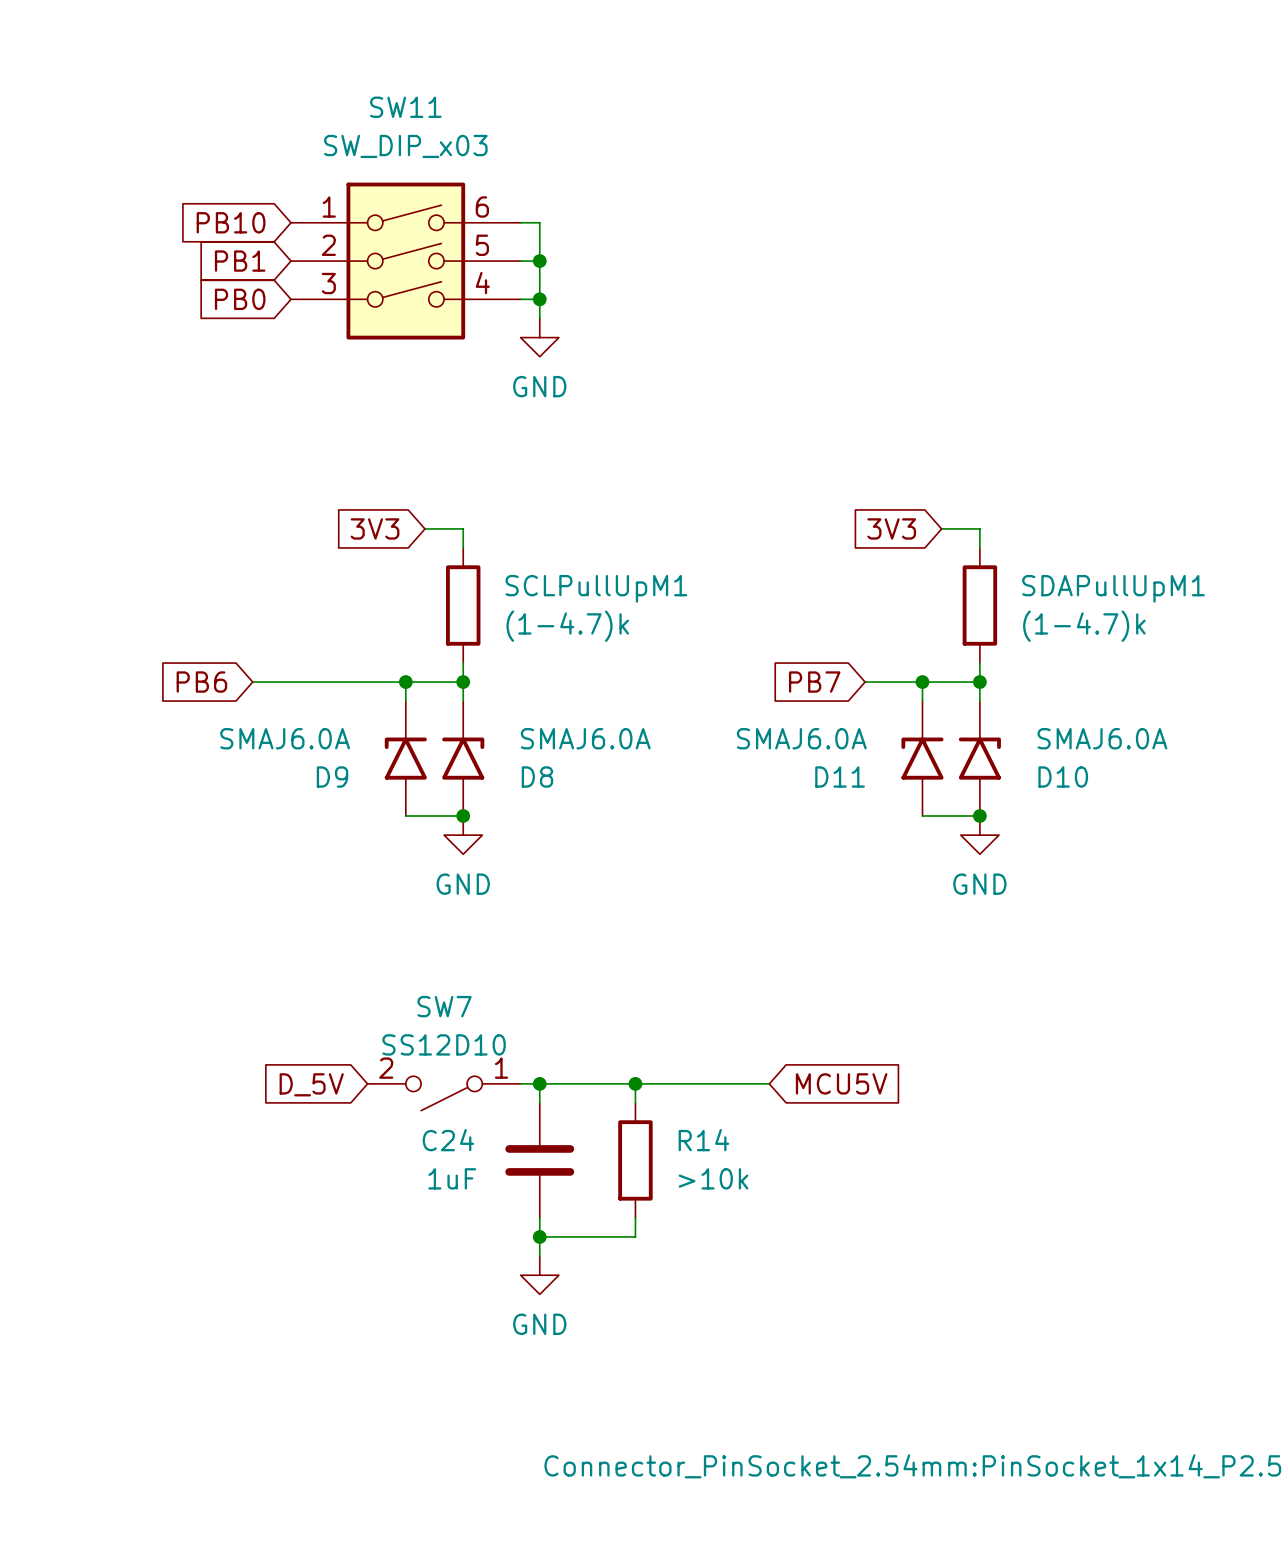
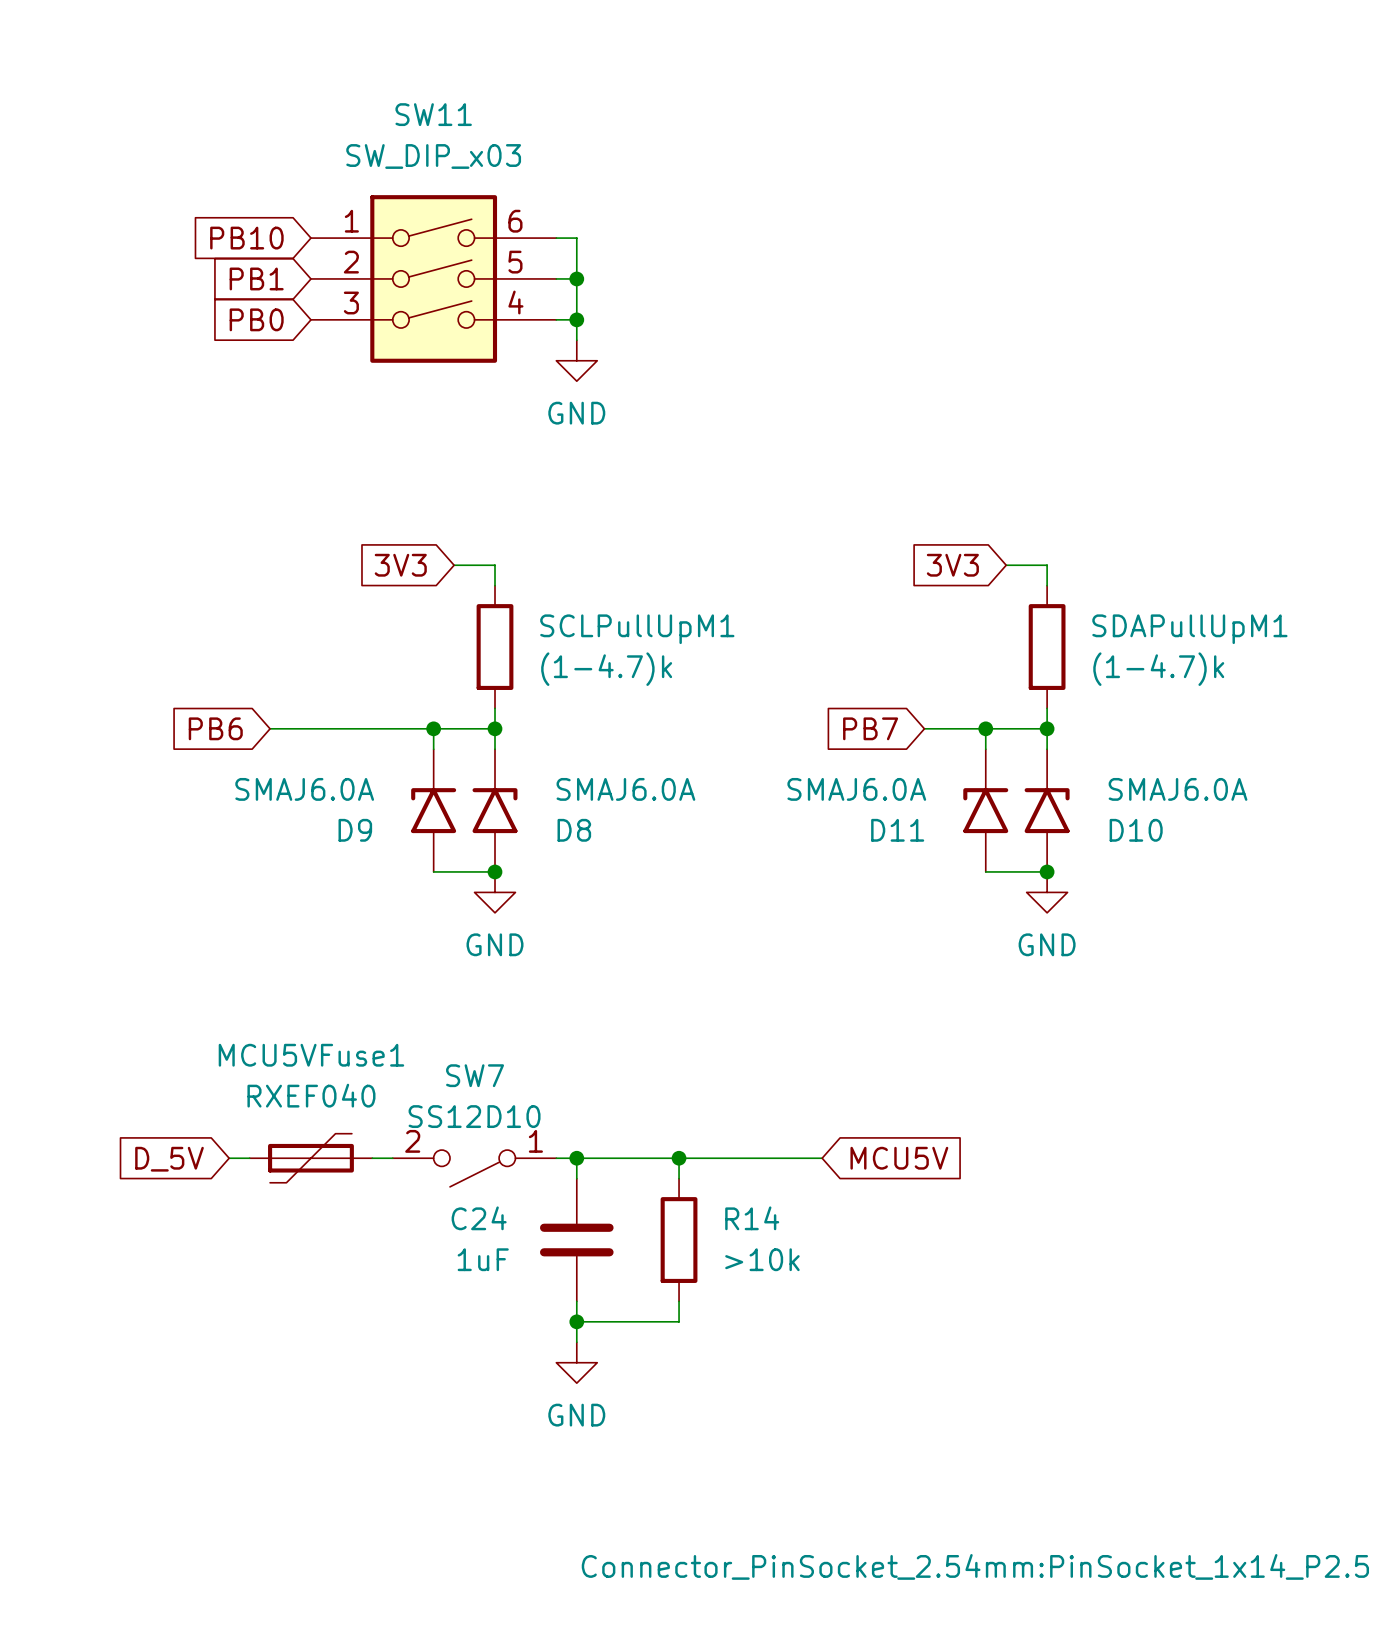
wire: none -> (229, 1158) (249, 1158)
MCU5VFuse1: none -> RXEF040 (310, 1158)
wire: none -> (372, 1158) (392, 1158)
global label position: D_5V (311, 1084) -> D_5V (169, 1159)

